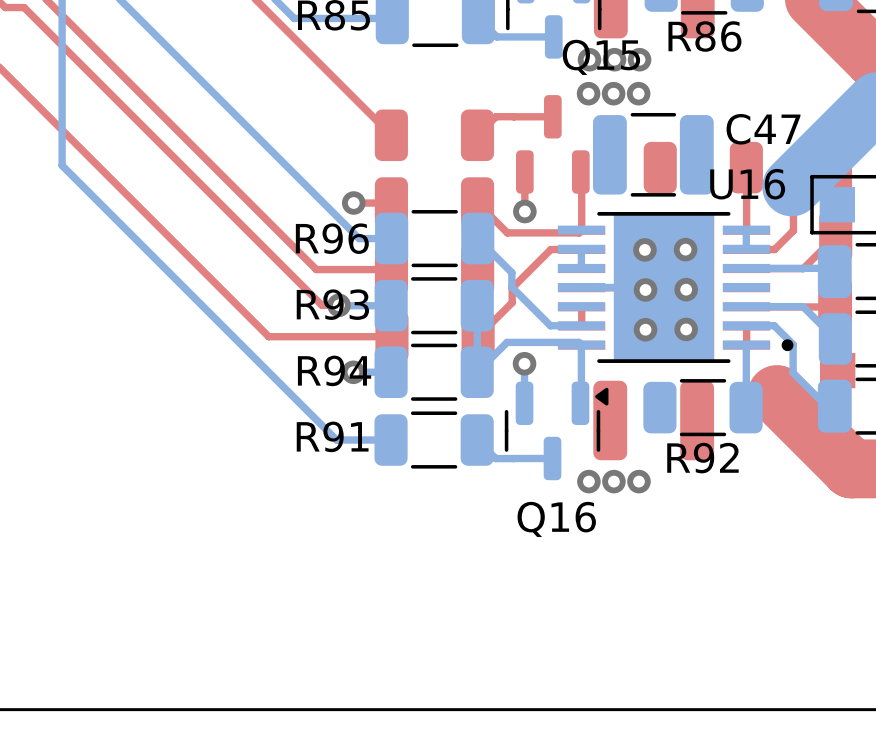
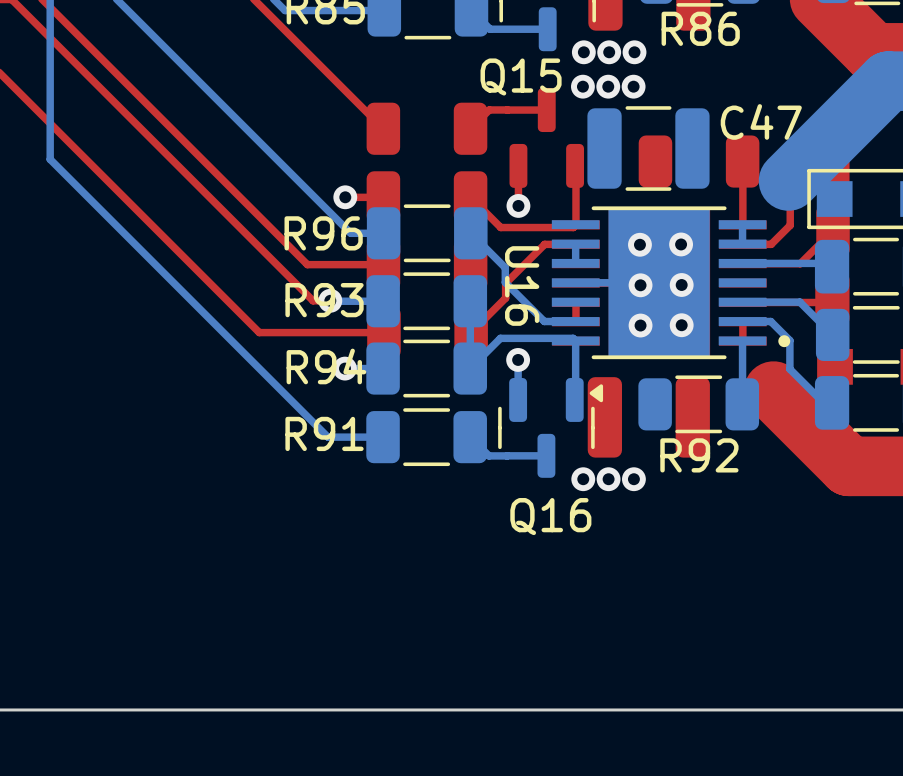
Q15 name position: Q15 (601, 57) -> Q15 (521, 76)
U16 name rotation: 0° (747, 184) -> 90° clockwise (522, 286)
U16 name position: U16 (747, 184) -> U16 (522, 286)

